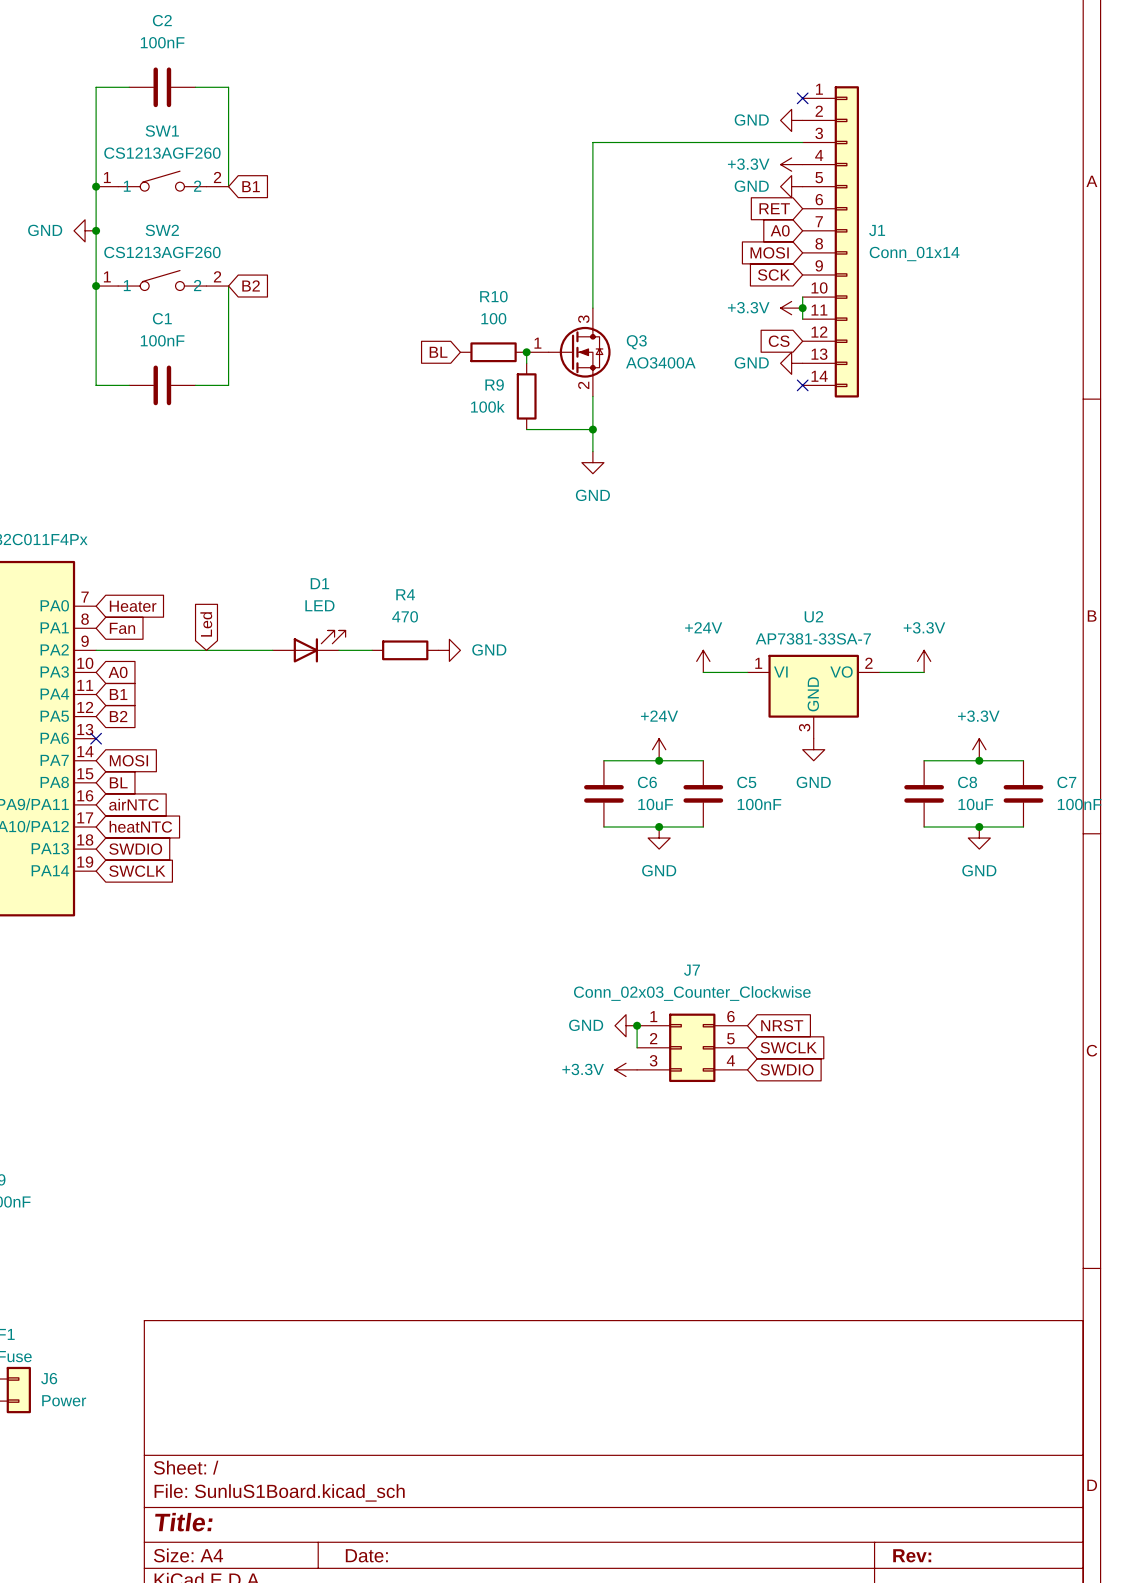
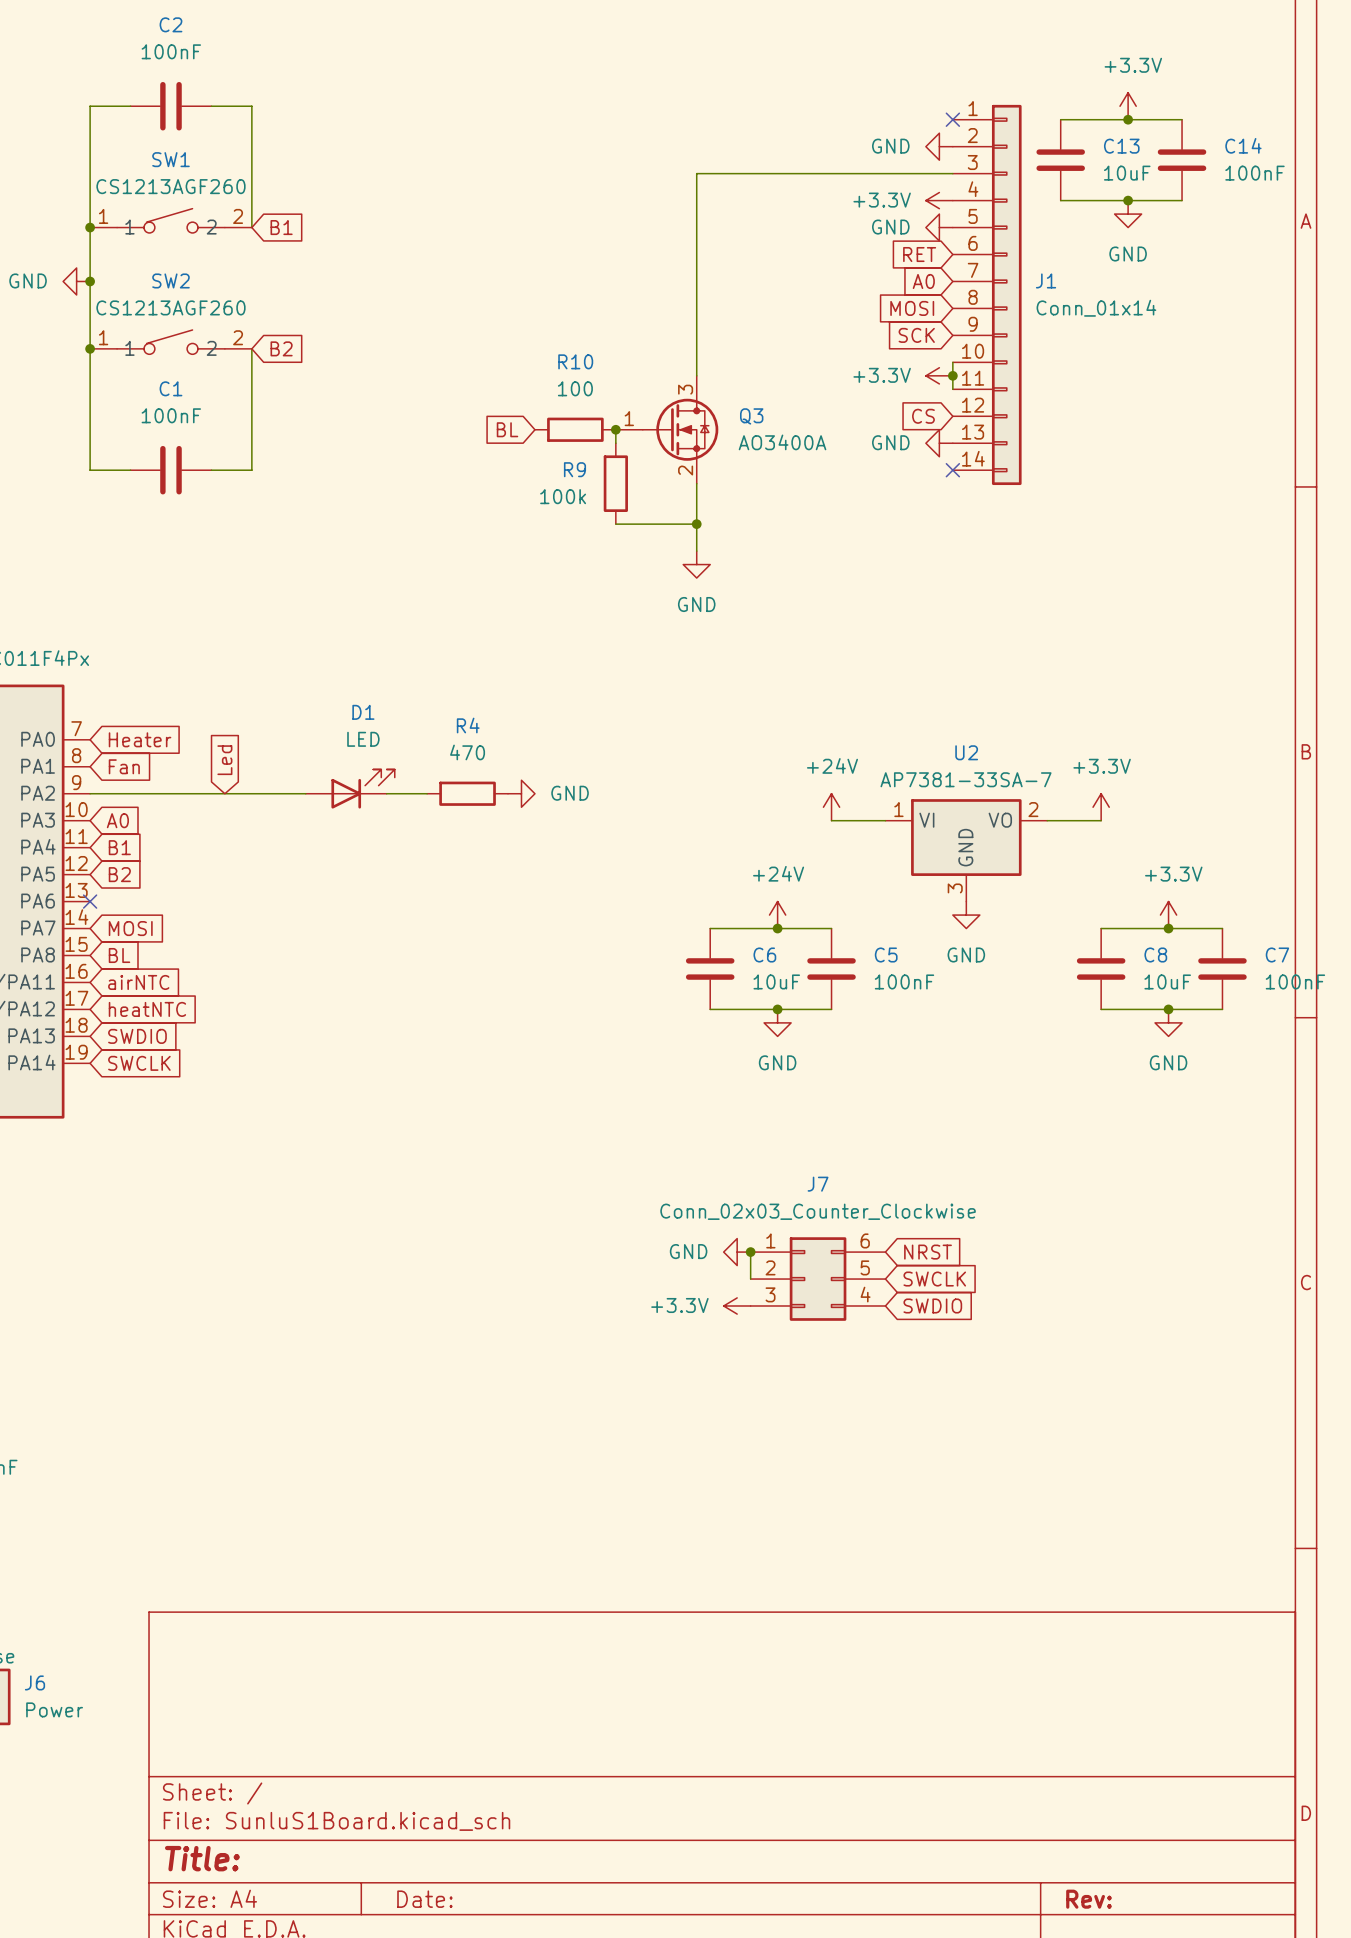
power symbol: none -> +3.3V (1128, 106)
wire: none -> (1060, 119) (1182, 119)
junction: none -> (1128, 119)
C13: none -> 10uF (1060, 160)
C14: none -> 100nF (1182, 160)
wire: none -> (1060, 200) (1182, 200)
junction: none -> (1128, 200)
power symbol: none -> GND (1128, 214)

